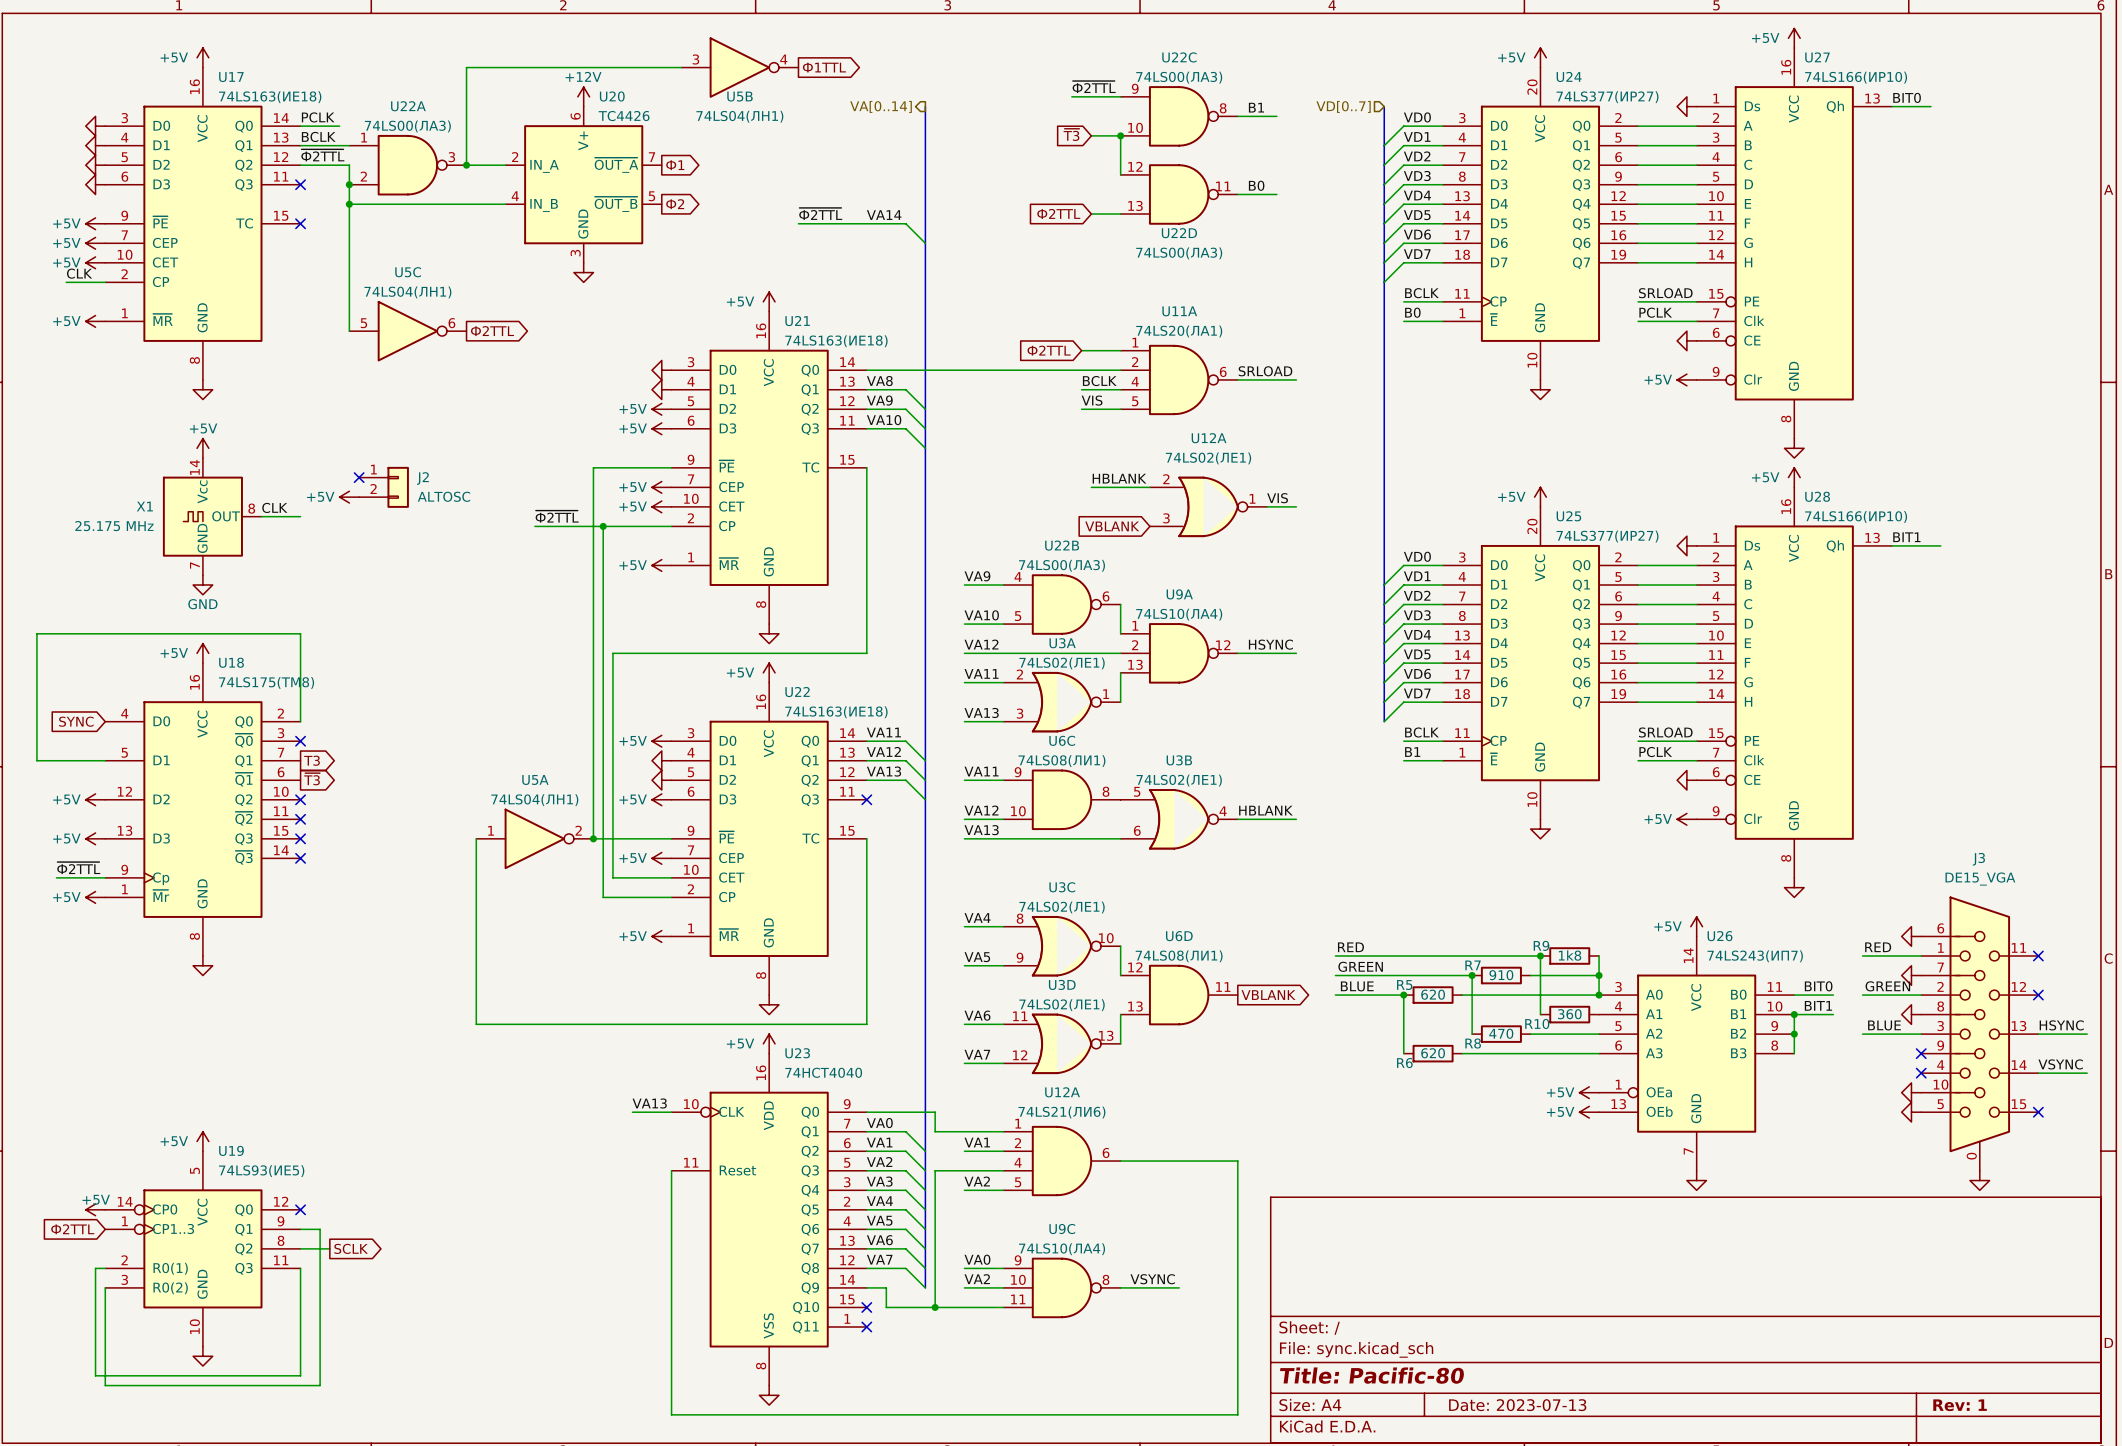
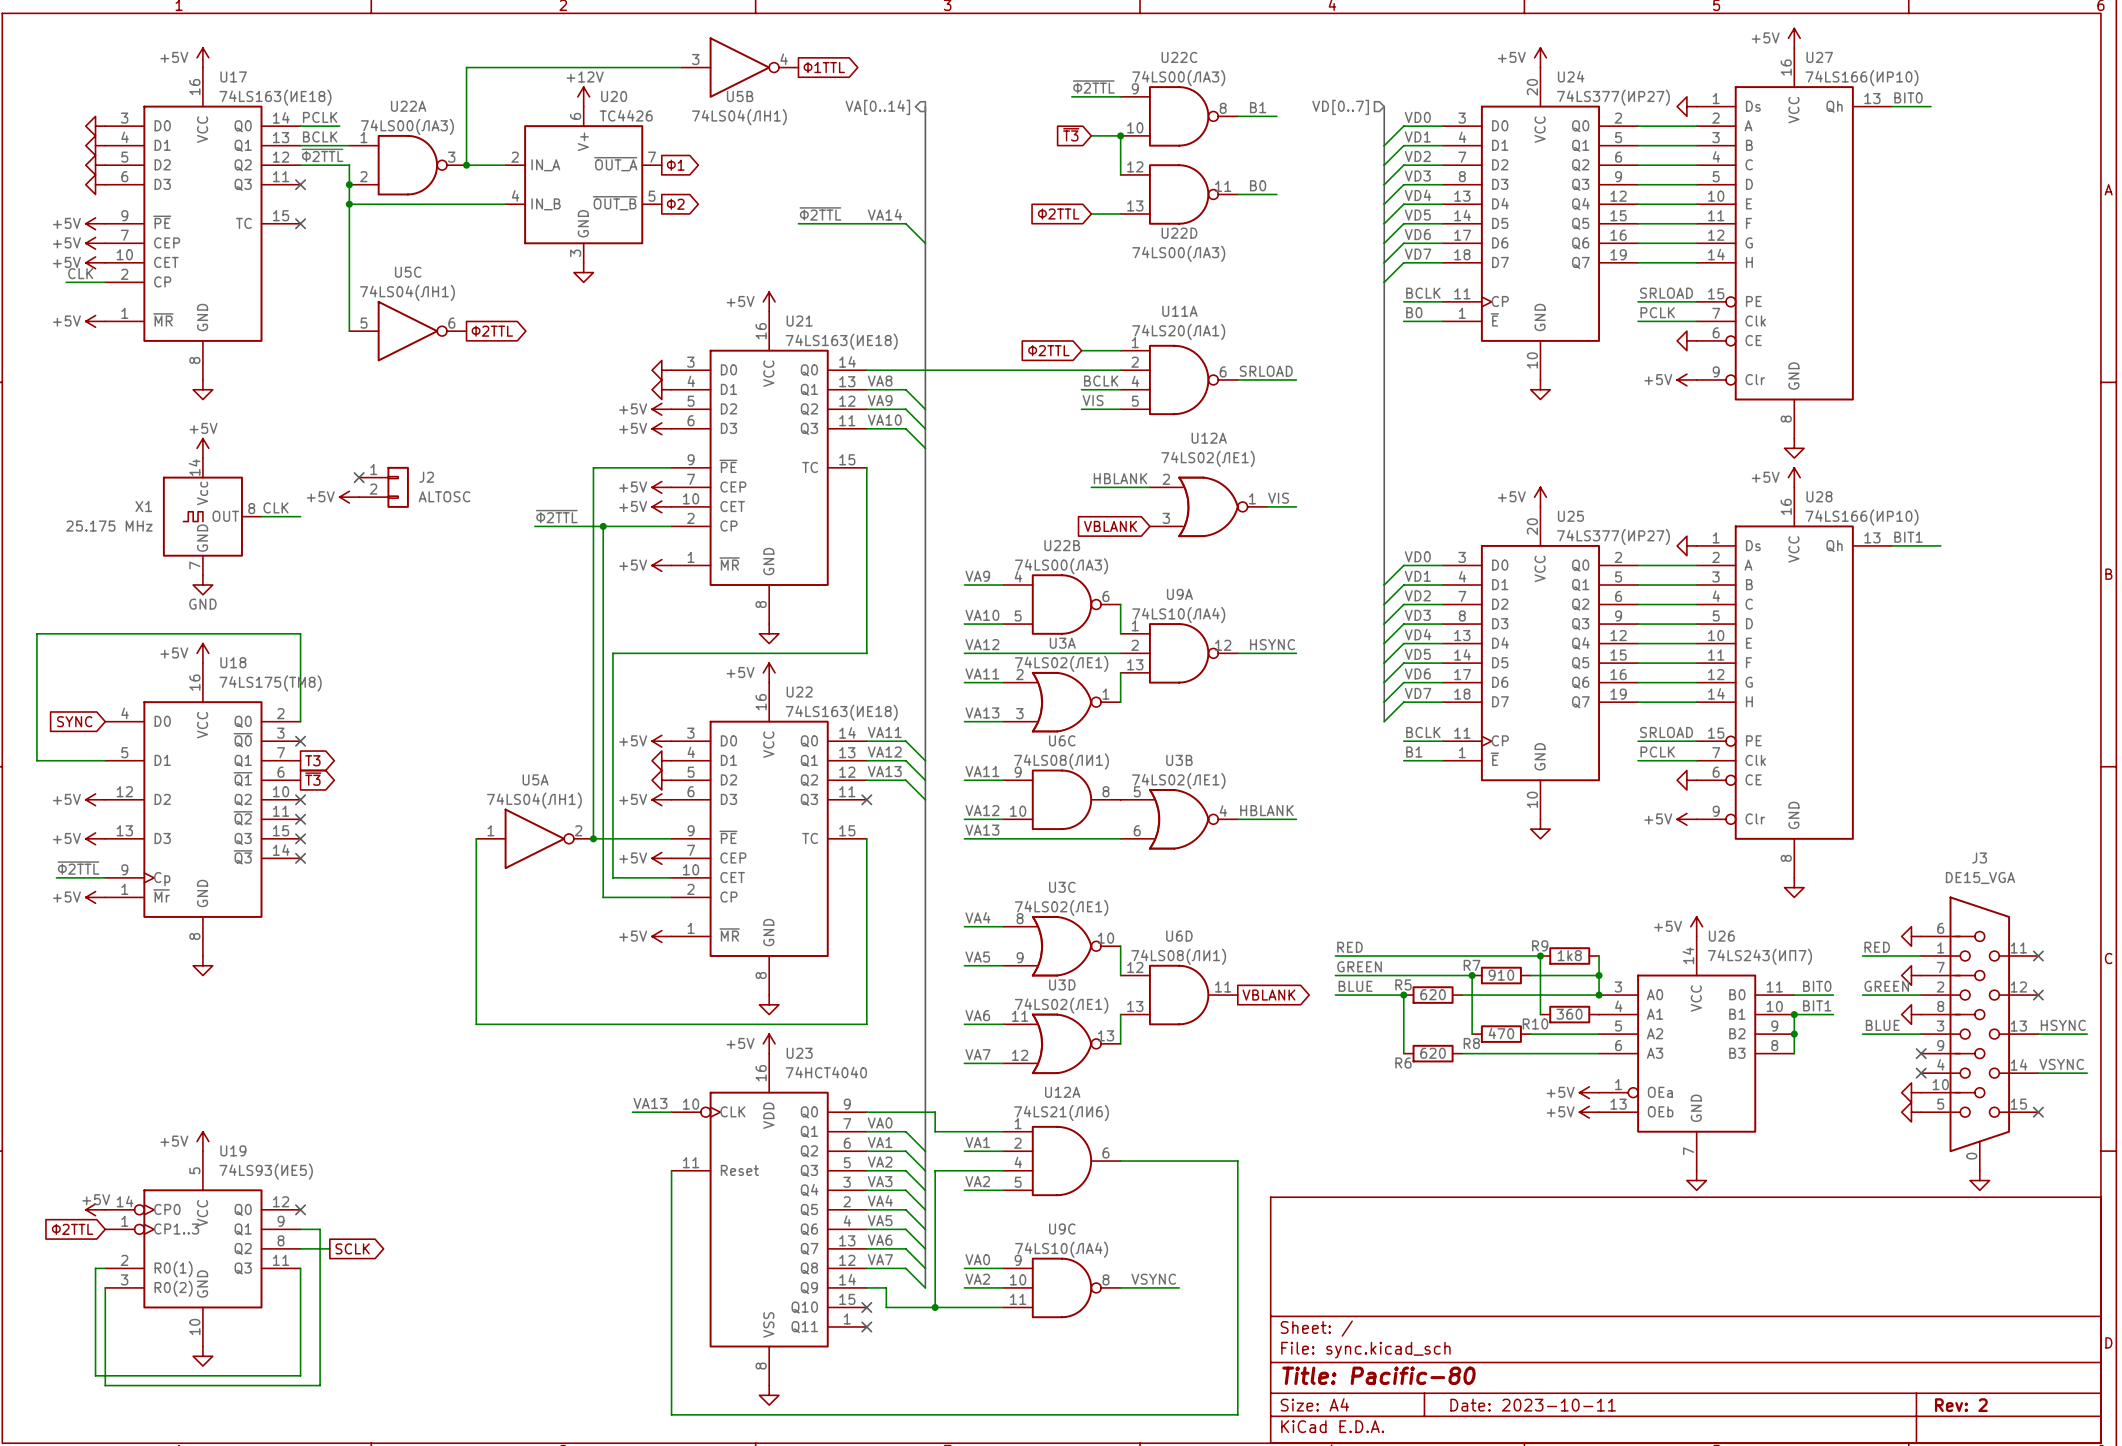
title block: Date: 2023-07-13 (1517, 1405) -> Date: 2023-10-11 (1533, 1405)
title block: Rev: 1 (1960, 1405) -> Rev: 2 (1961, 1405)

